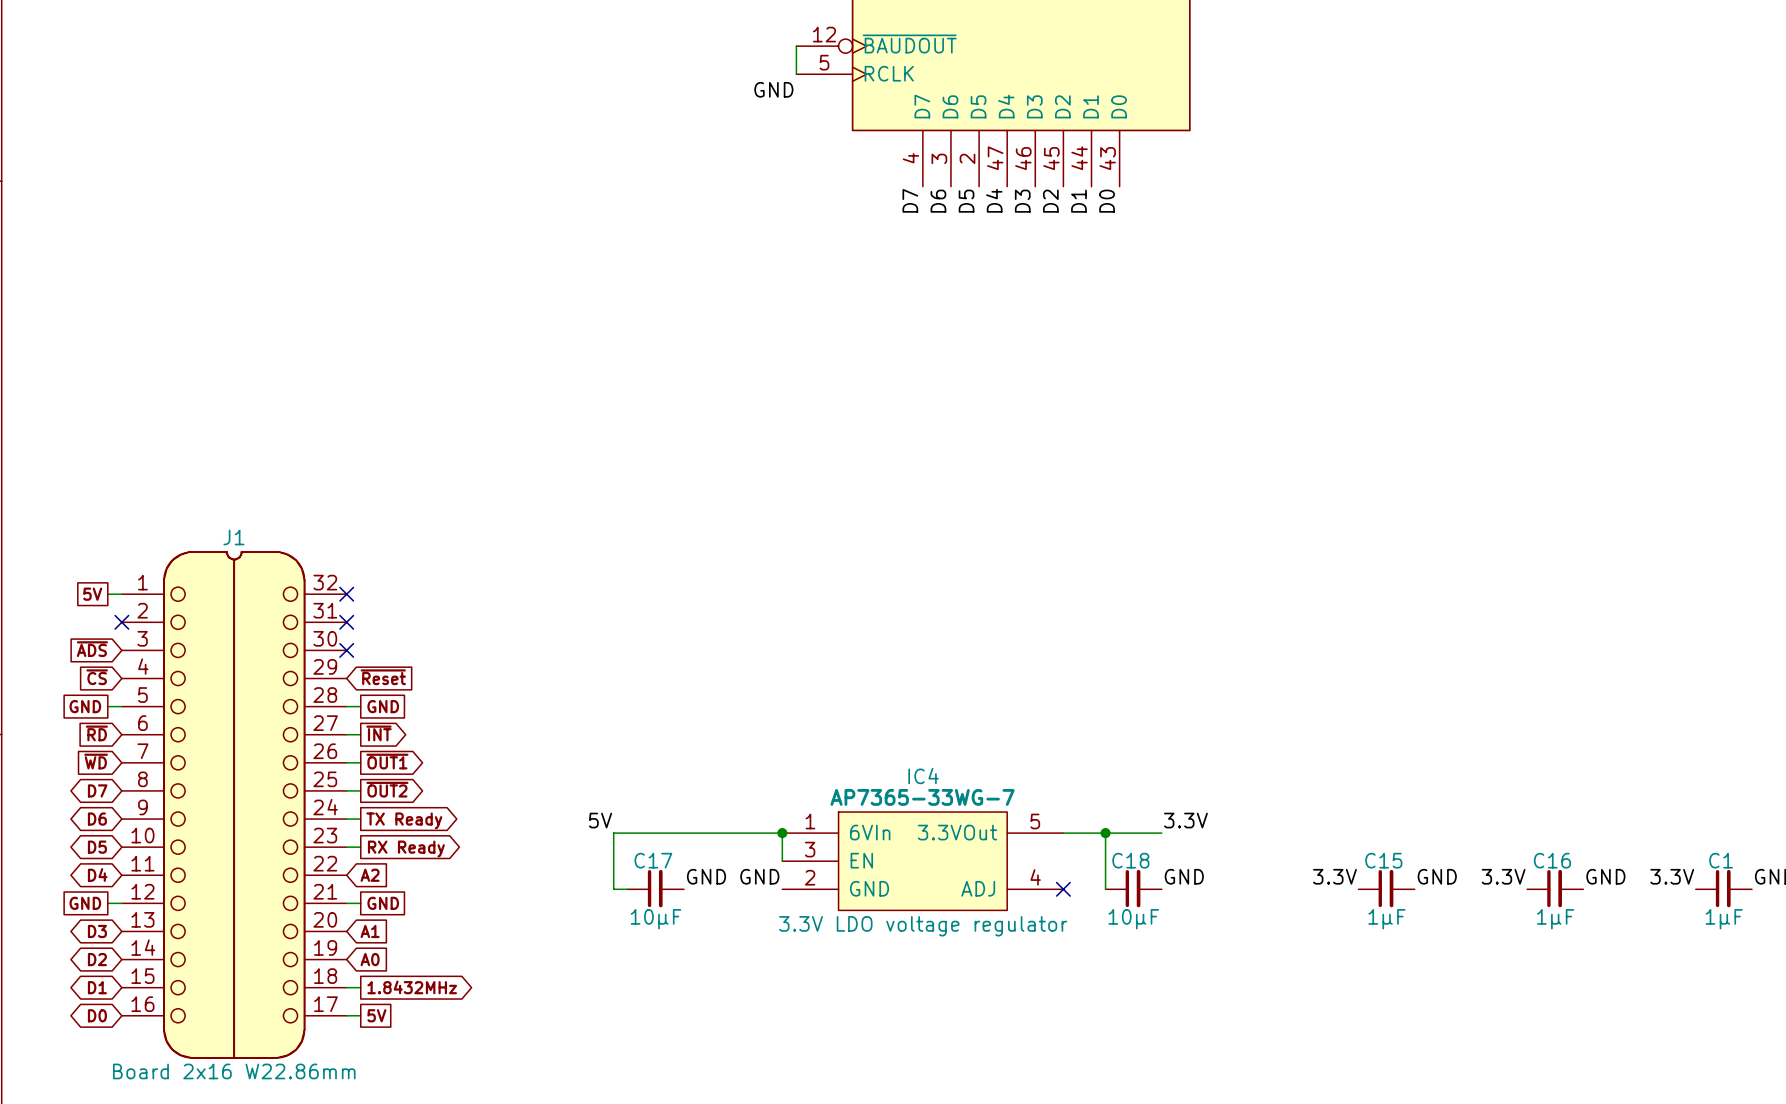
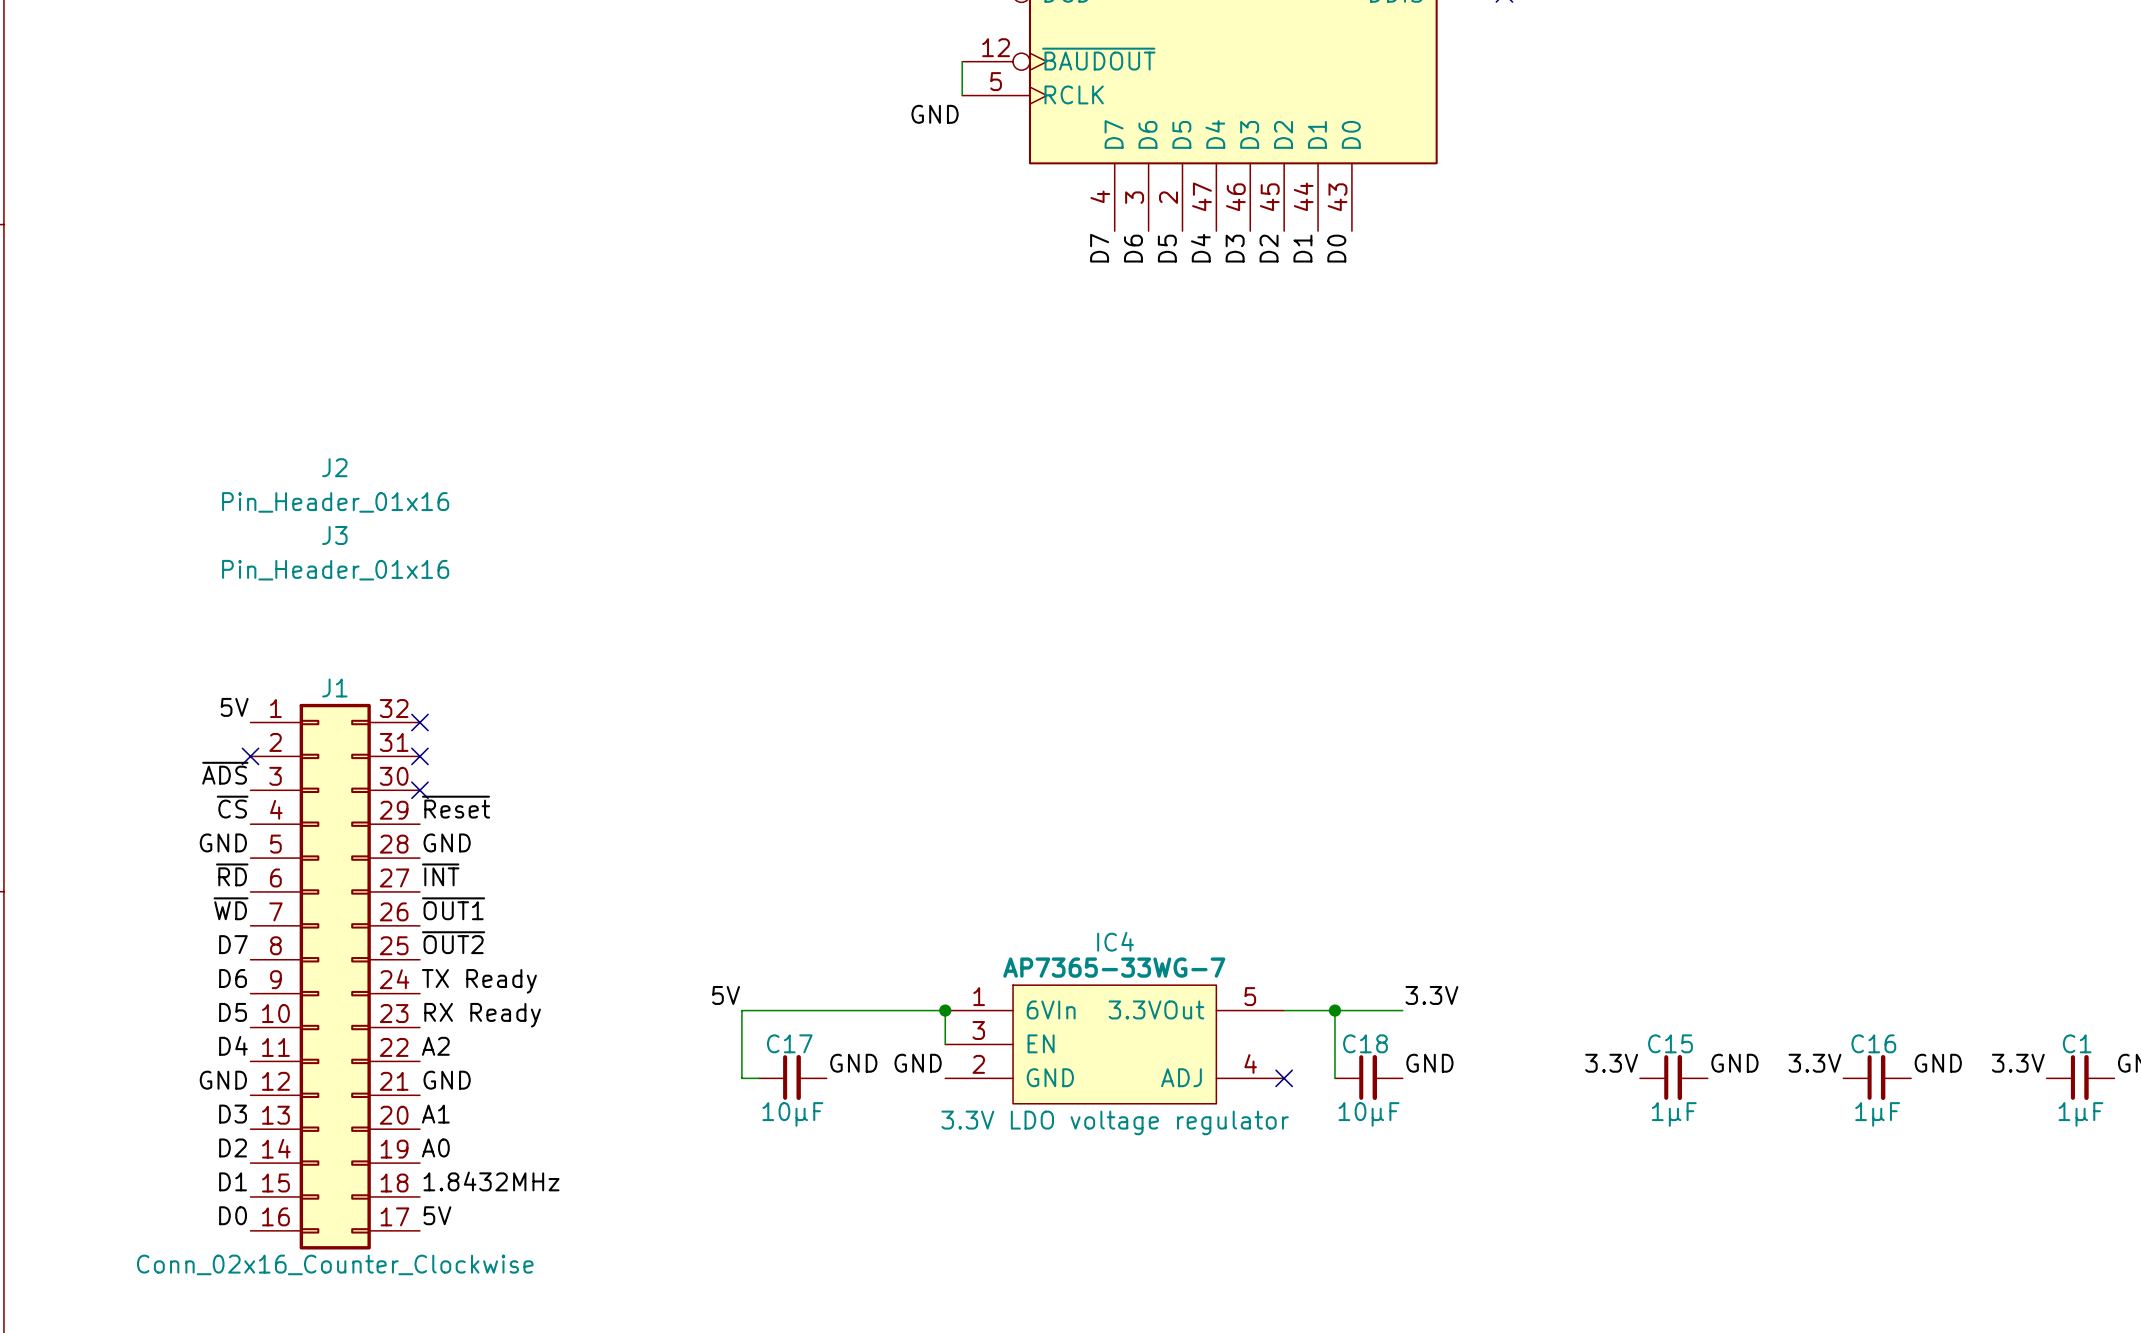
J2: none -> Pin_Header_01x16 (335, 485)
J3: none -> Pin_Header_01x16 (335, 553)
J1 name position: J1 (233, 537) -> J1 (334, 687)
J1 symbol: [121, 552, 347, 1058] -> [250, 703, 420, 1250]
label: none -> 5V (234, 707)
global label: 5V (92, 594) -> none
wire: (107, 594) (121, 594) -> none
no-connect mark: (121, 622) -> none
no-connect mark: none -> (250, 756)
label: none -> ~{ADS} (225, 773)
global label: ~{ADS} (92, 649) -> none
label: none -> ~{CS} (232, 807)
label: none -> ~{Reset} (456, 807)
global label: ~{CS} (97, 677) -> none
global label: ~{Reset} (383, 677) -> none
label: none -> GND (223, 842)
label: none -> GND (447, 842)
global label: GND (85, 706) -> none
wire: (107, 706) (121, 706) -> none
wire: (346, 706) (360, 706) -> none
global label: GND (383, 706) -> none
label: none -> ~{RD} (232, 874)
label: none -> ~{INT} (440, 874)
global label: ~{RD} (96, 733) -> none
global label: ~{INT} (379, 733) -> none
wire: (346, 734) (360, 734) -> none
label: none -> ~{WD} (231, 908)
label: none -> ~{OUT1} (453, 908)
global label: ~{WD} (96, 761) -> none
global label: ~{OUT1} (387, 761) -> none
wire: (346, 762) (360, 762) -> none
label: none -> ~{OUT2} (453, 942)
label: none -> D7 (233, 944)
global label: ~{OUT2} (387, 789) -> none
global label: D7 (97, 790) -> none
wire: (346, 790) (360, 790) -> none
label: none -> D6 (233, 978)
label: none -> TX Ready (479, 981)
global label: D6 (97, 819) -> none
wire: (346, 819) (360, 819) -> none
global label: TX Ready (404, 820) -> none
label: none -> D5 (233, 1012)
label: none -> RX Ready (482, 1015)
global label: D5 (97, 847) -> none
wire: (346, 847) (360, 847) -> none
global label: RX Ready (406, 848) -> none
label: none -> D4 (233, 1045)
label: none -> A2 (435, 1046)
global label: D4 (97, 874) -> none
global label: A2 (370, 875) -> none
label: none -> GND (223, 1080)
label: none -> GND (447, 1080)
global label: GND (85, 903) -> none
wire: (107, 903) (121, 903) -> none
wire: (346, 903) (360, 903) -> none
global label: GND (383, 903) -> none
label: none -> D3 (233, 1114)
label: none -> A1 (435, 1114)
global label: D3 (97, 931) -> none
global label: A1 (370, 931) -> none
label: none -> D2 (233, 1147)
label: none -> A0 (435, 1147)
global label: D2 (97, 959) -> none
global label: A0 (370, 959) -> none
label: none -> 1.8432MHz (491, 1181)
label: none -> D1 (233, 1181)
global label: D1 (97, 987) -> none
wire: (346, 987) (360, 987) -> none
global label: 1.8432MHz (412, 987) -> none
label: none -> D0 (233, 1215)
label: none -> 5V (437, 1215)
global label: D0 (97, 1015) -> none
wire: (346, 1015) (360, 1015) -> none
global label: 5V (376, 1015) -> none
J1 value: Board 2x16 W22.86mm (234, 1071) -> Conn_02x16_Counter_Clockwise (335, 1264)

